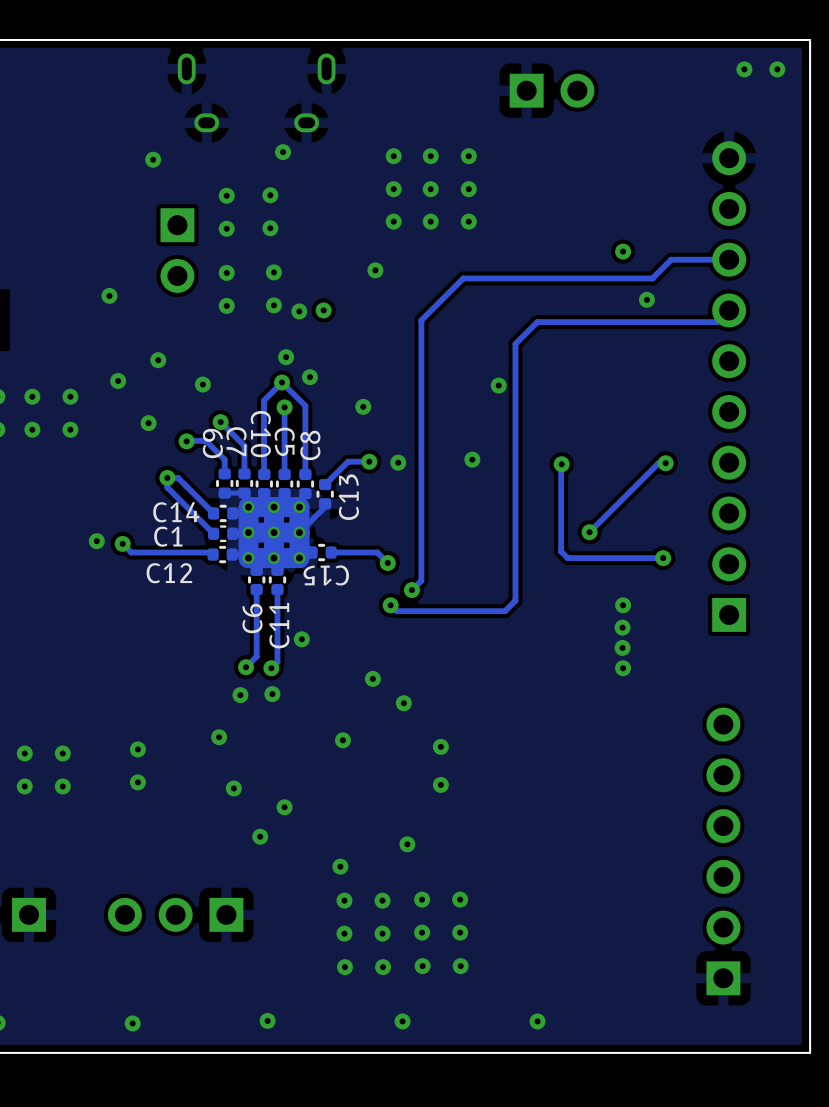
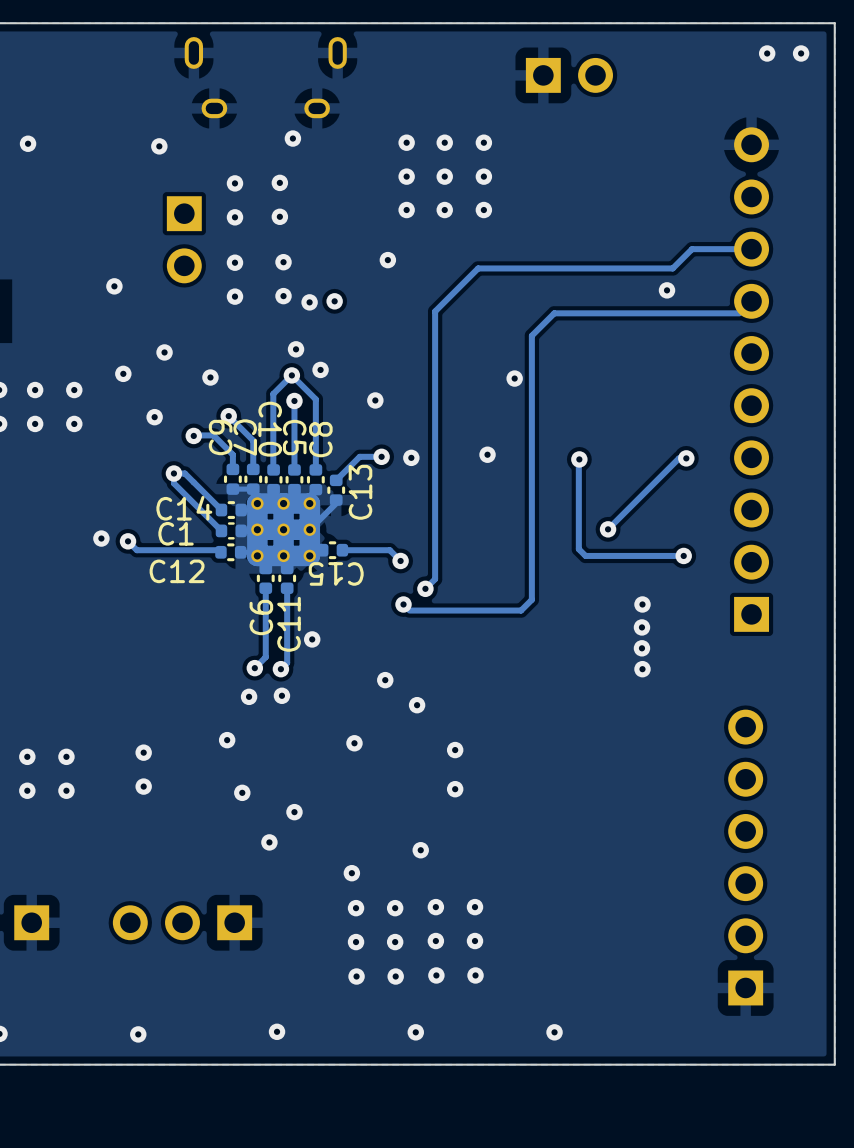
via: none -> (28, 143)
via: (623, 251) -> none

